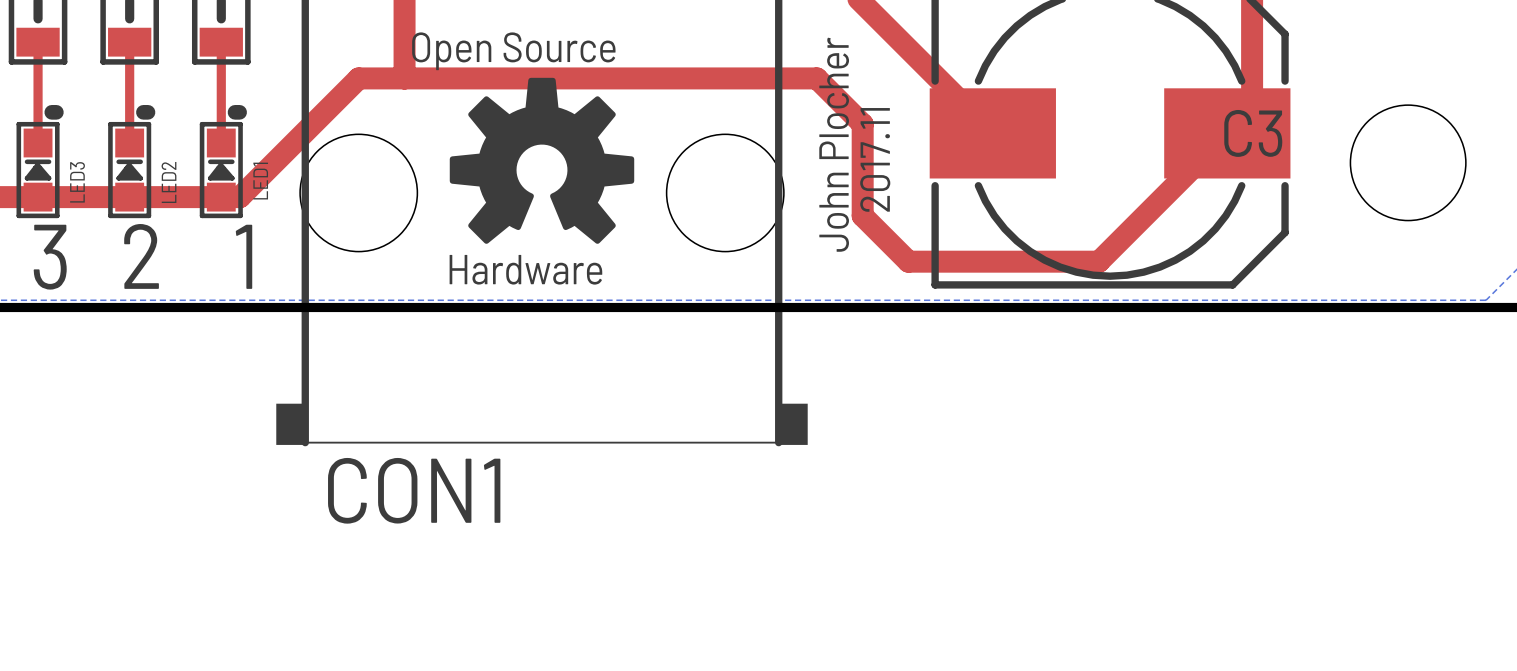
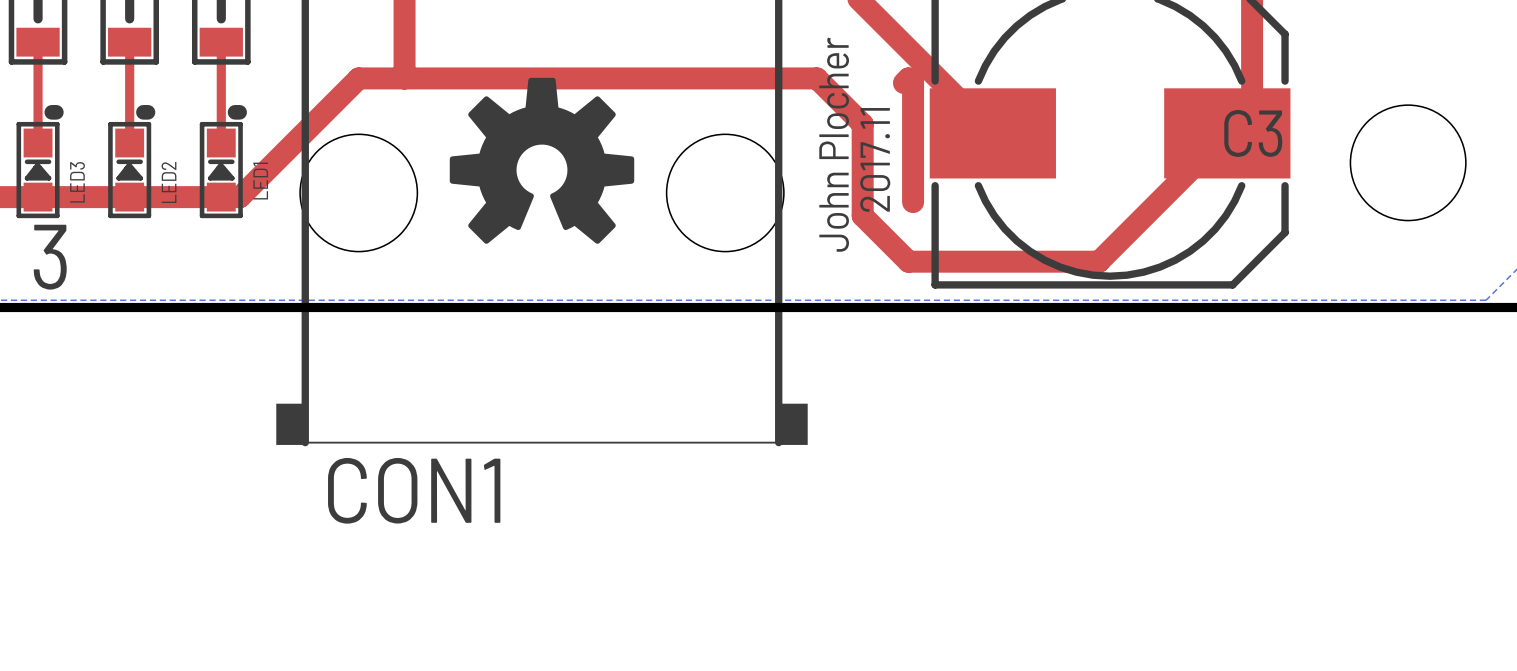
text: Open Source (513, 51) -> none
top track: none -> (903, 83) (908, 78) (913, 83) (913, 202)
text: 2 (141, 256) -> none
text: 1 (244, 256) -> none
text: Hardware (525, 269) -> none

